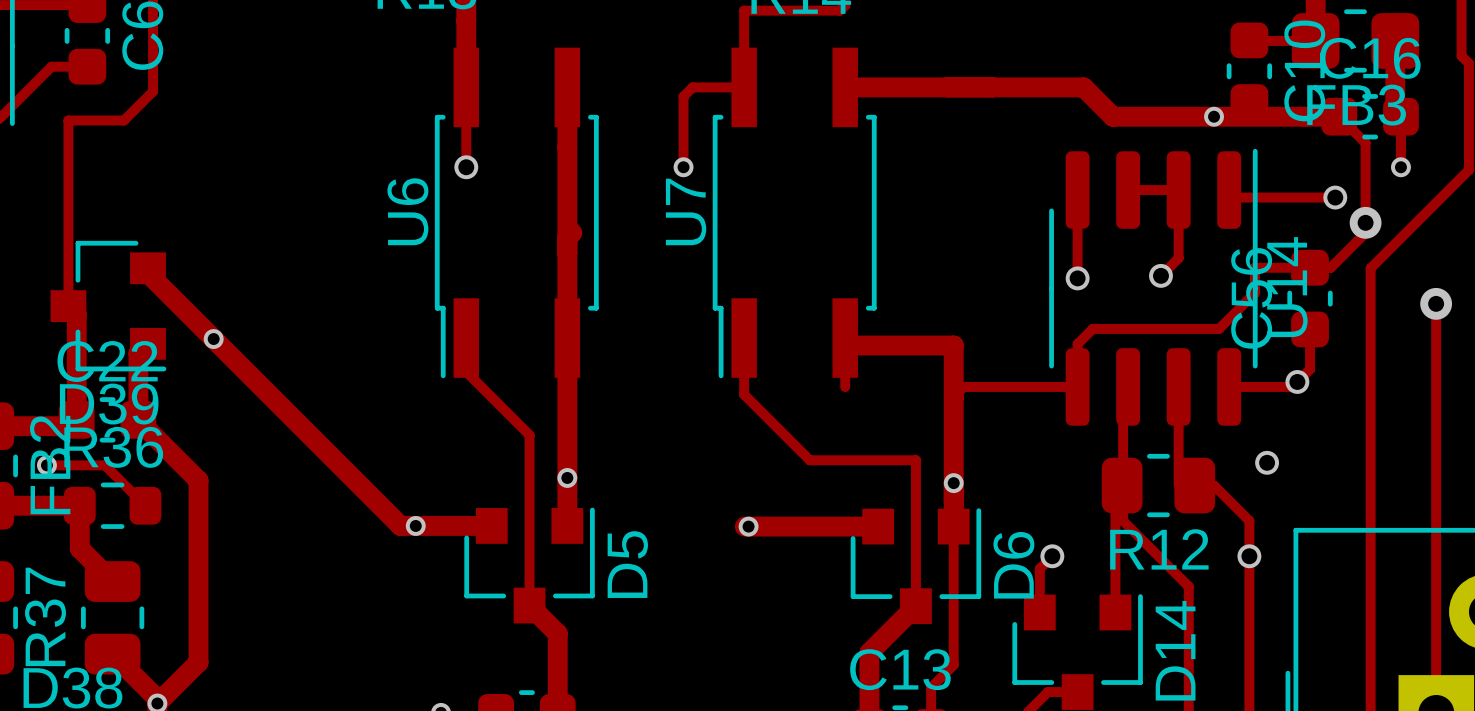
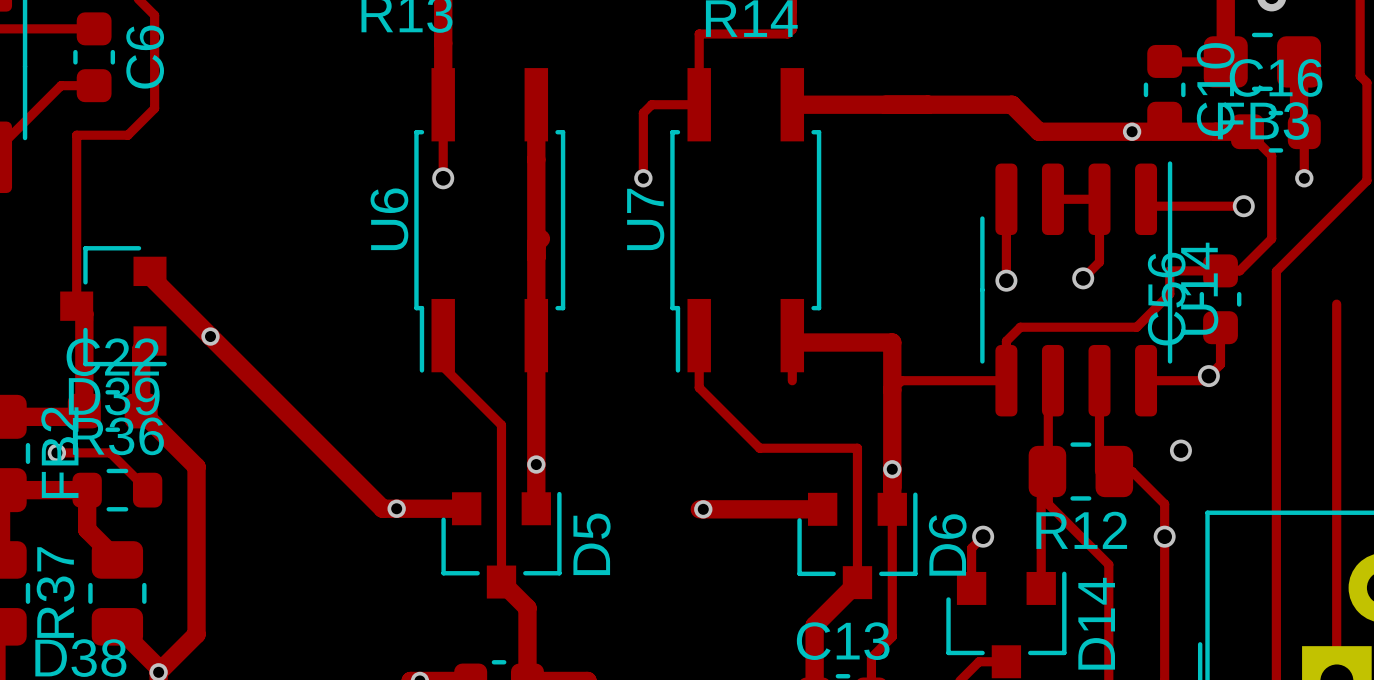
via: (1365, 222) -> none
via: (1436, 303) -> none

